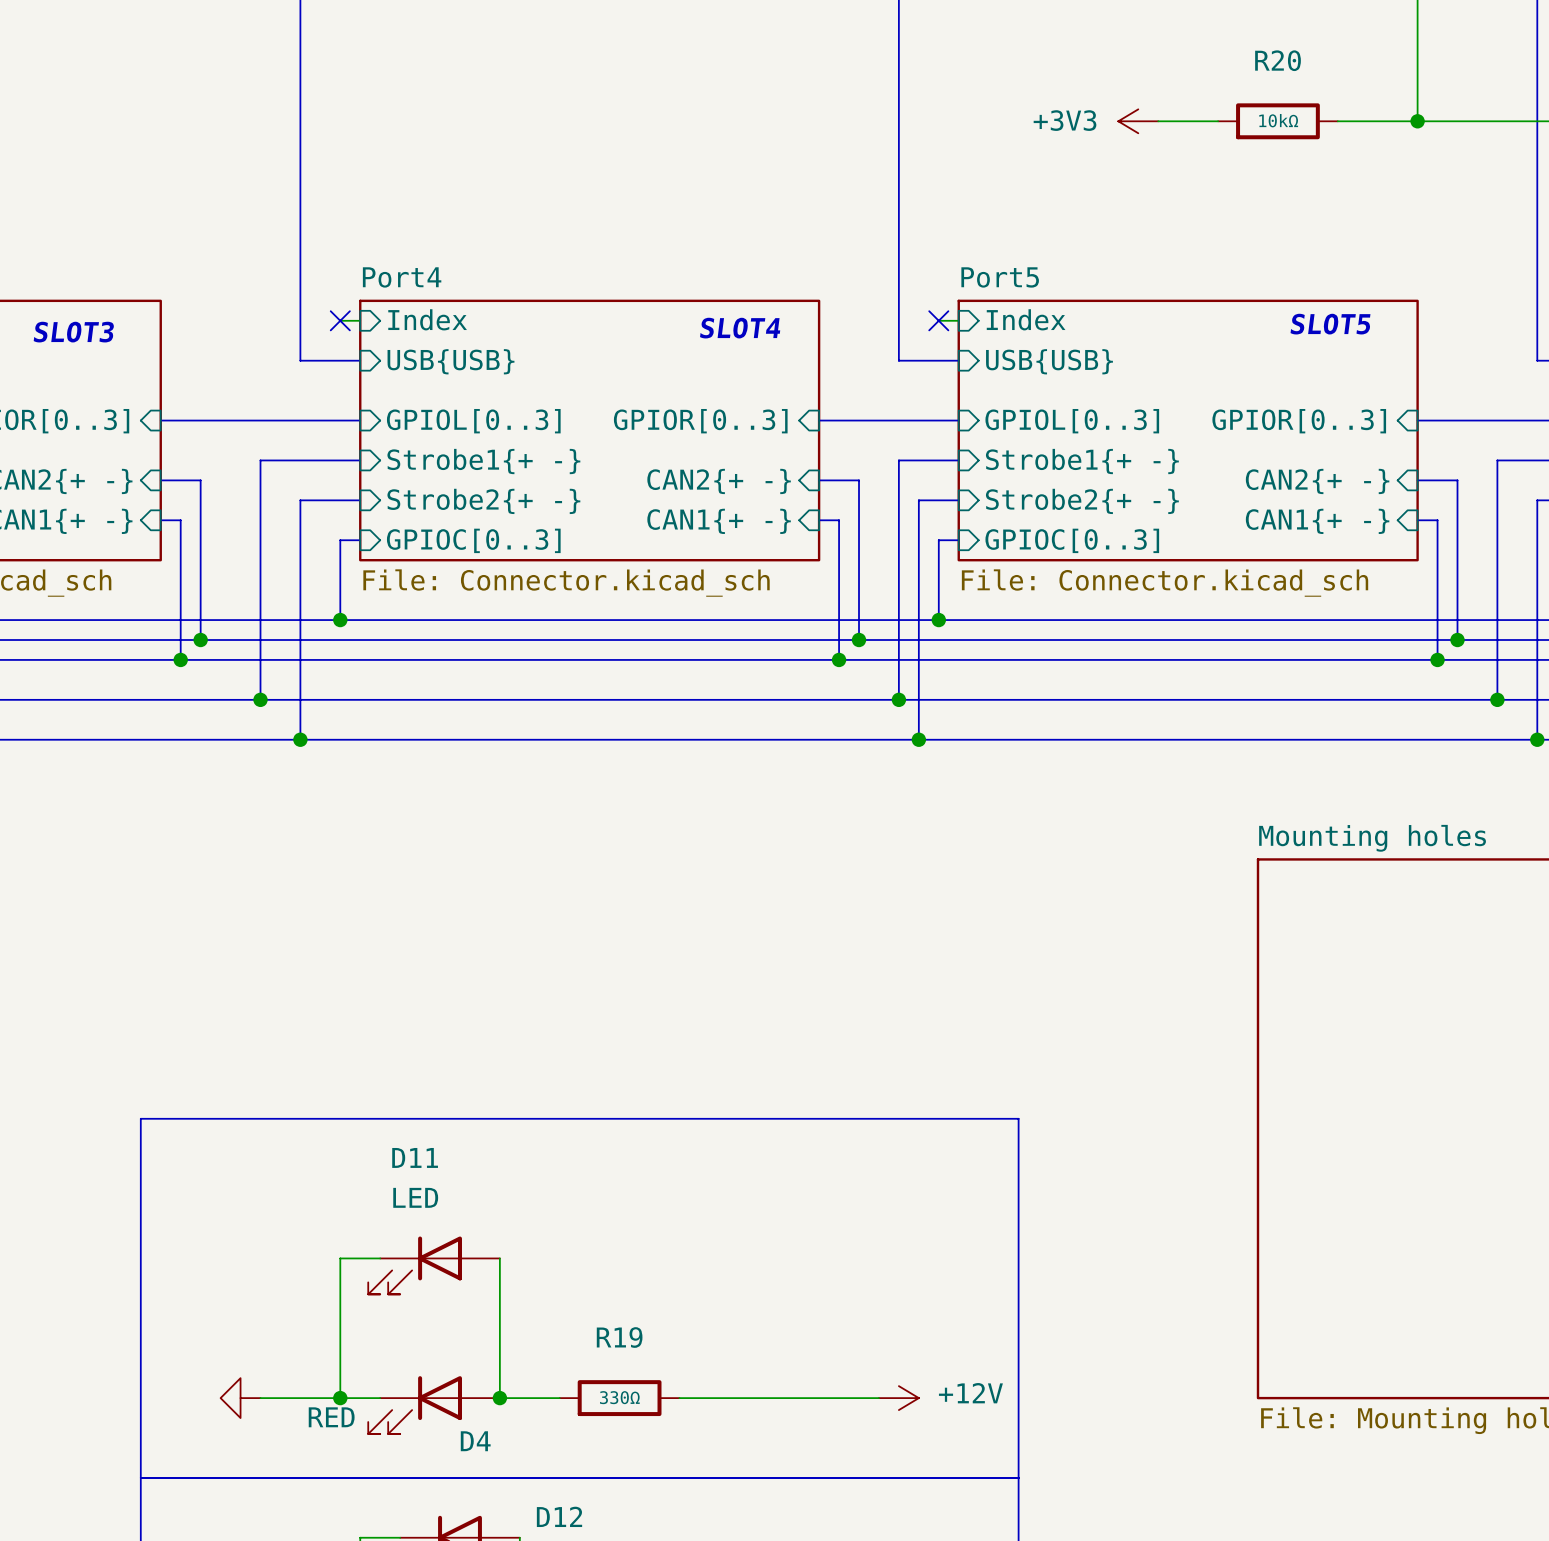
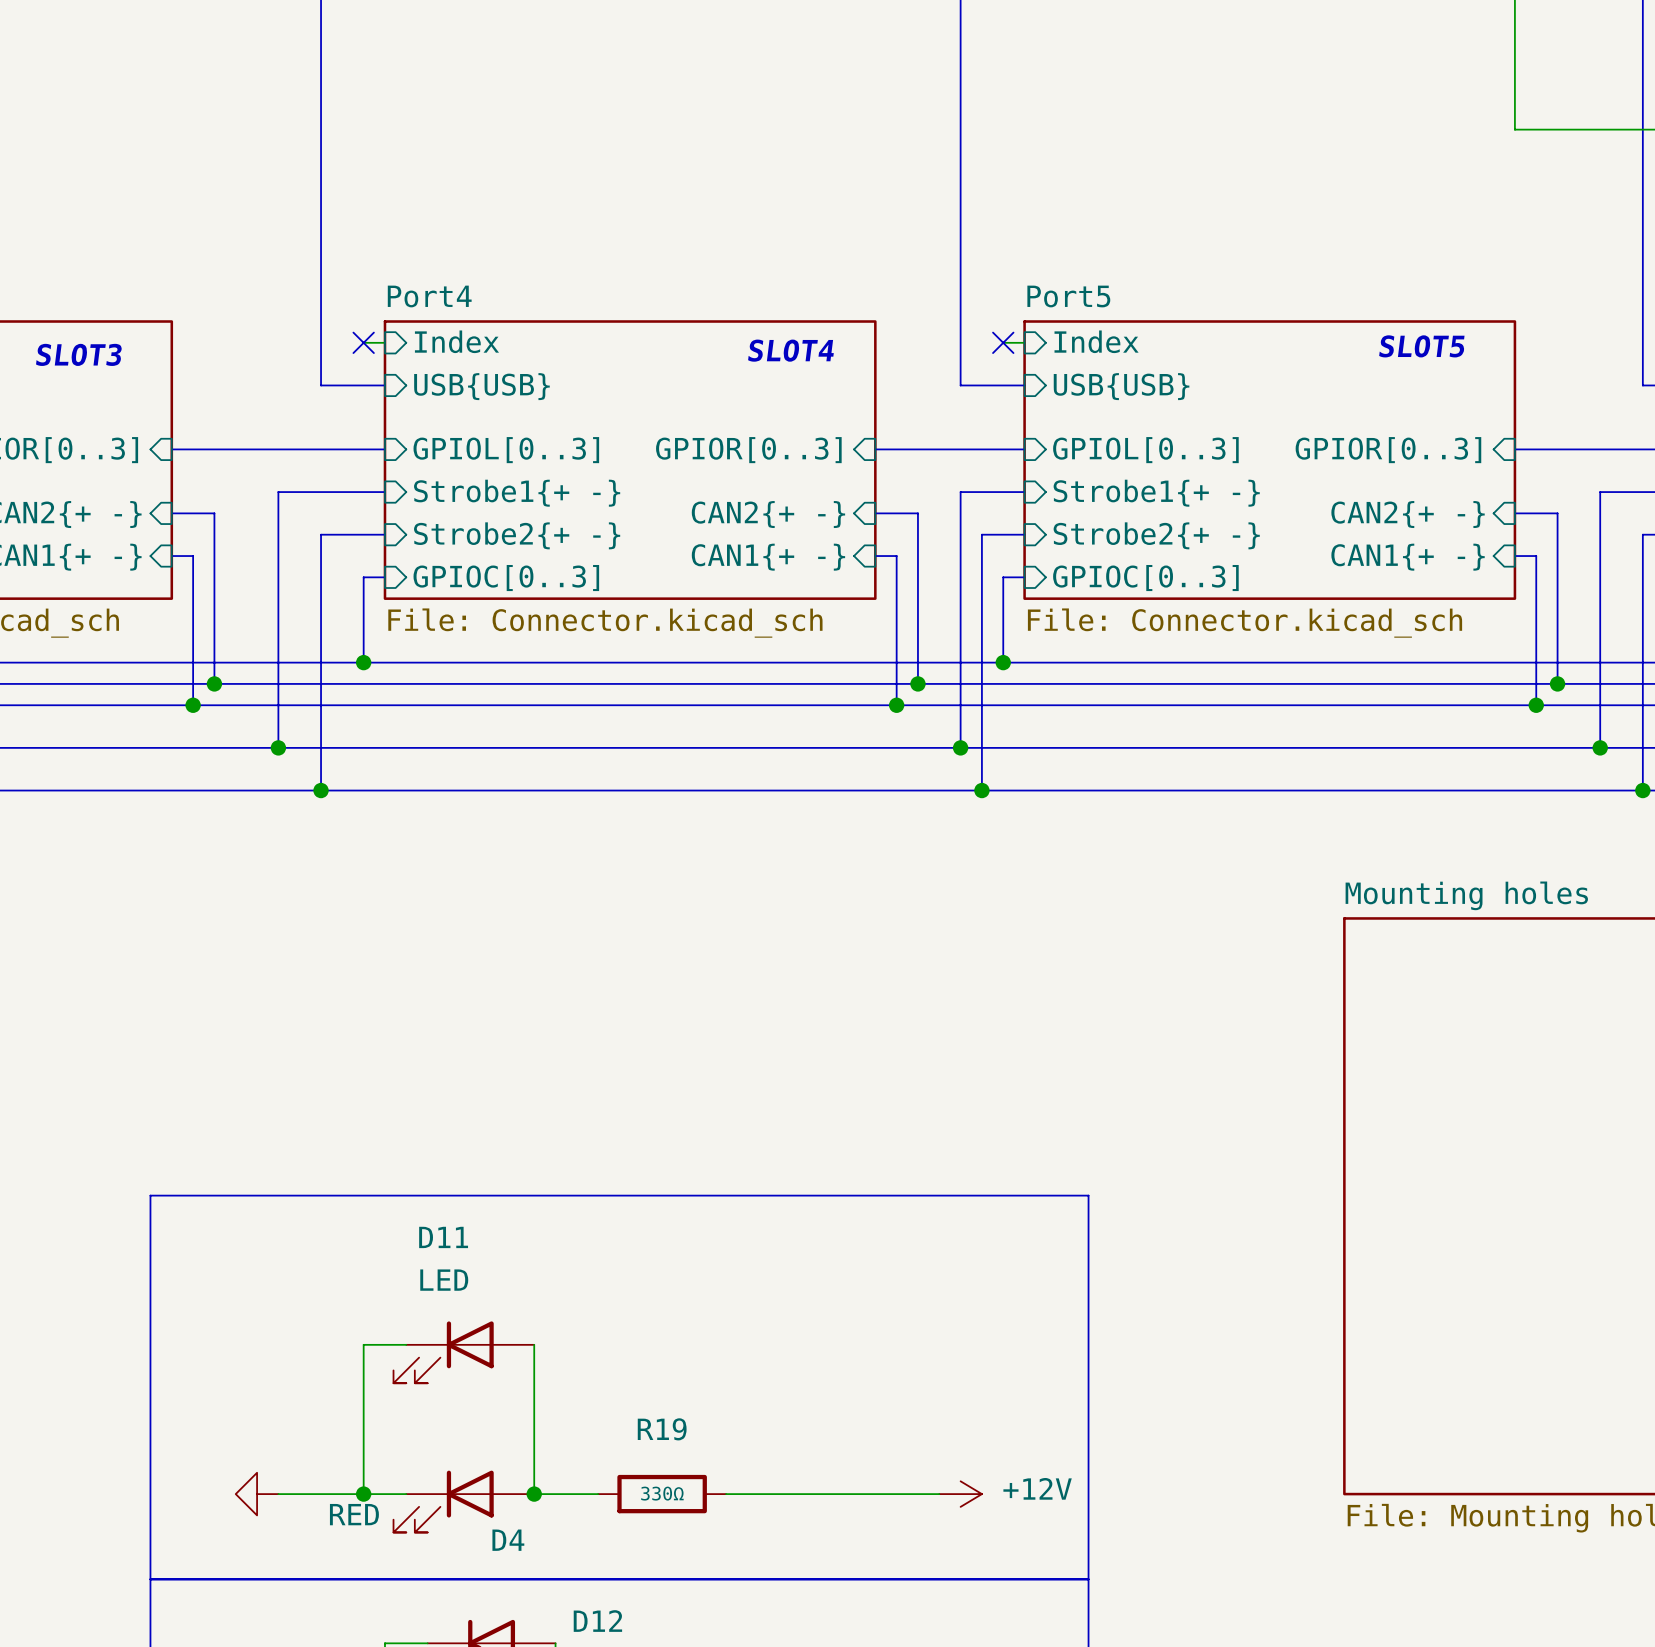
power symbol: +3V3 (1138, 121) -> none
wire: (1158, 121) (1218, 121) -> none
R20: 10kΩ (1277, 121) -> none
wire: (1337, 121) (1417, 121) -> none
junction: (1417, 121) -> none

